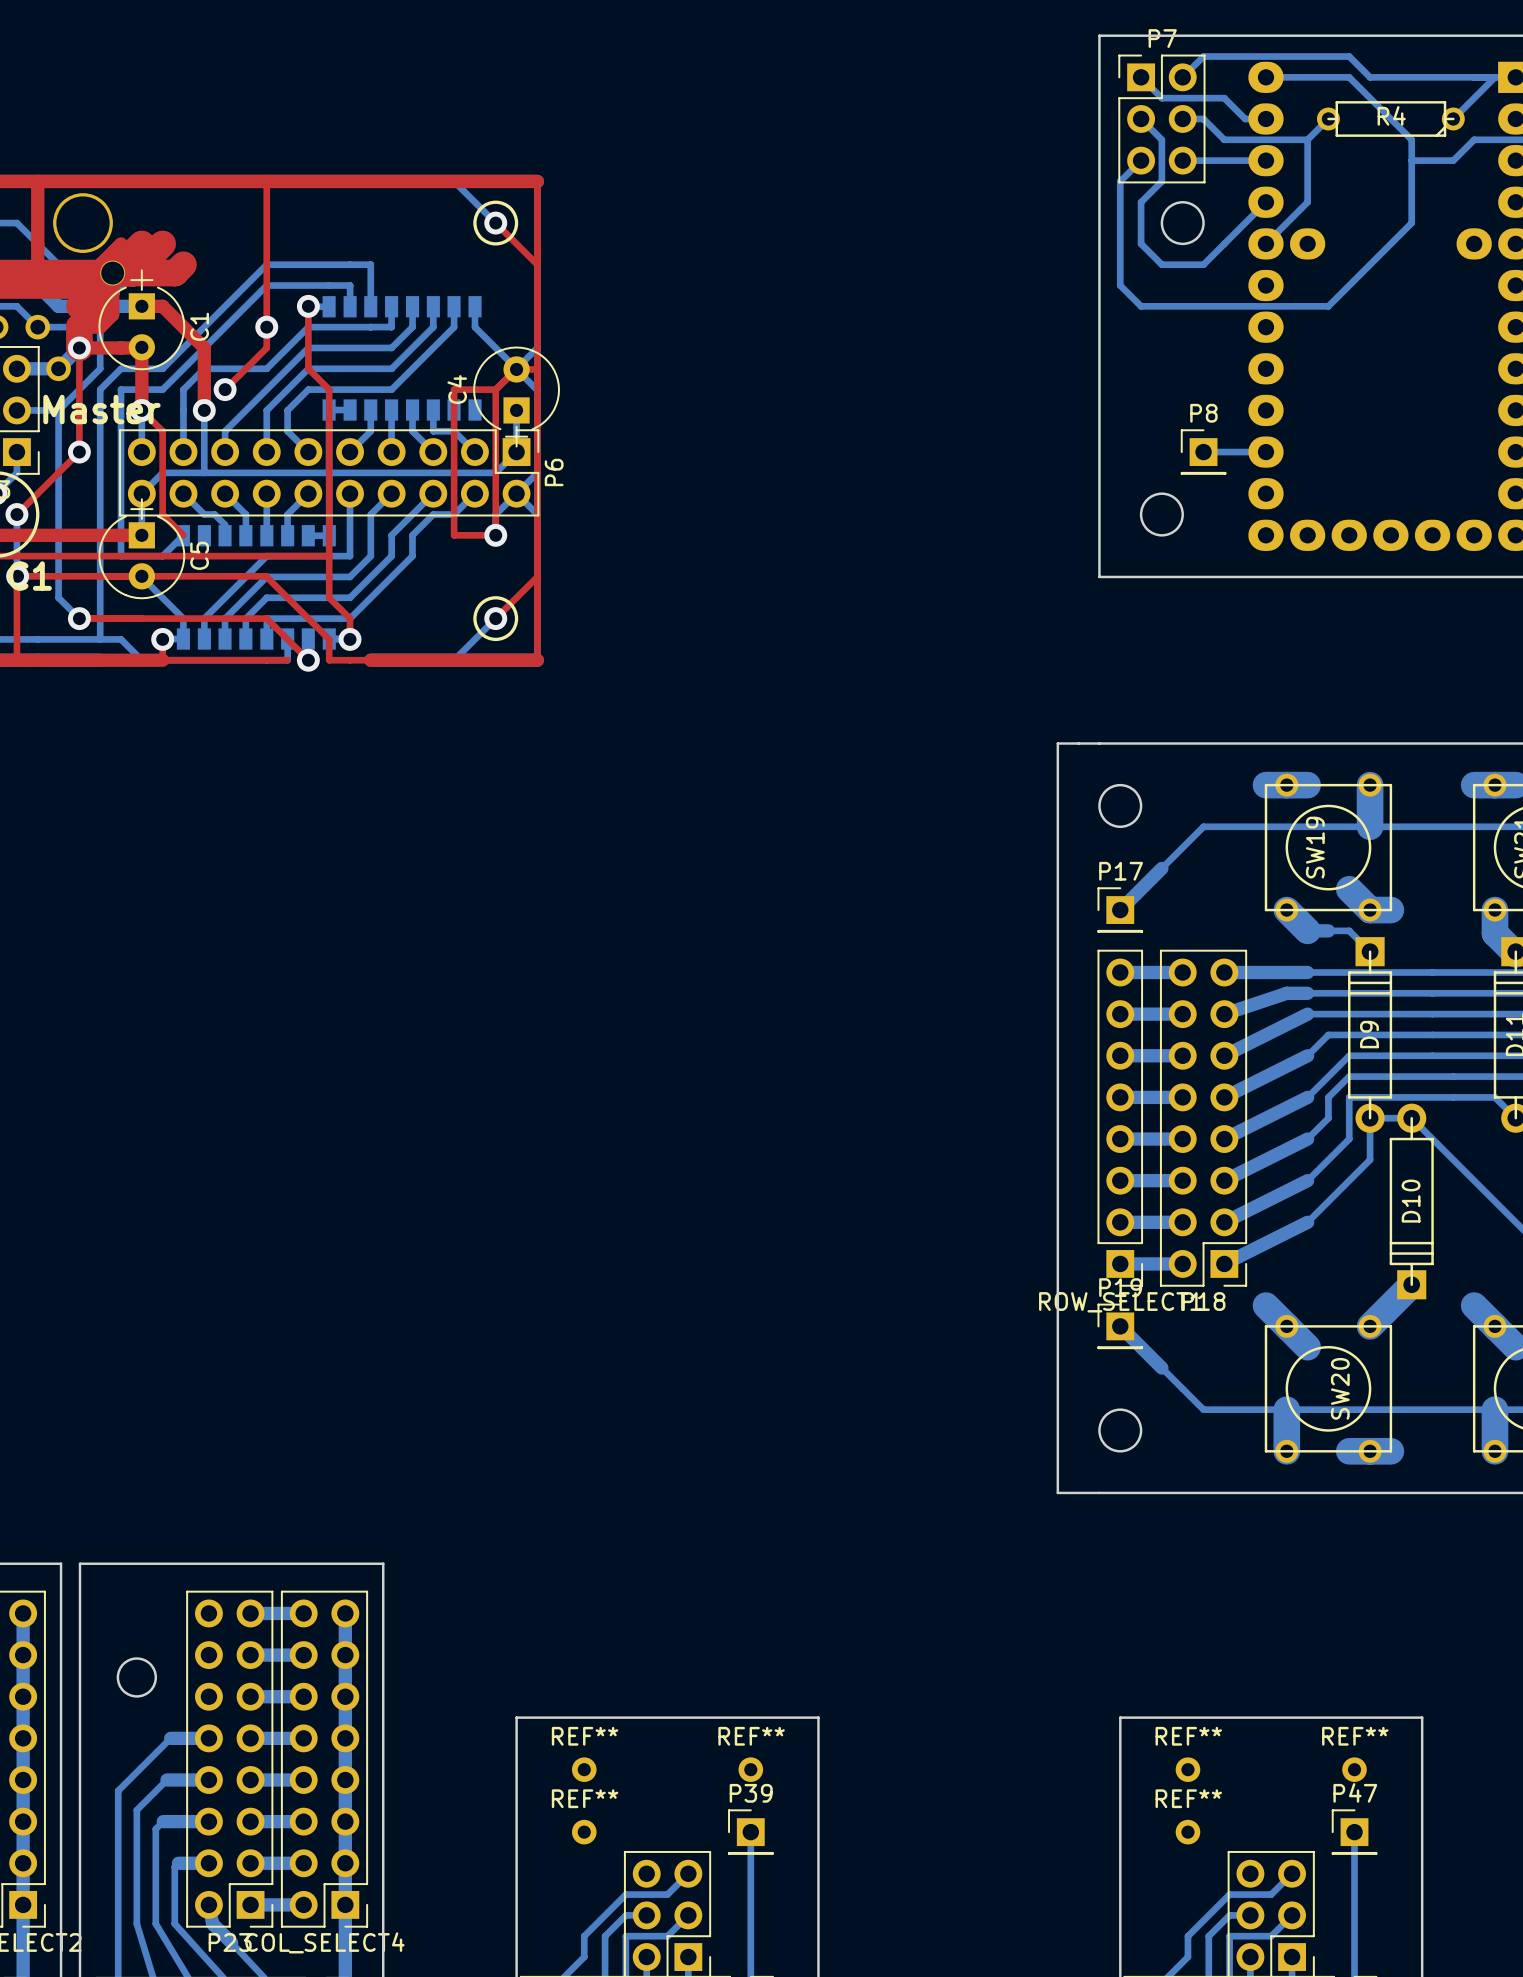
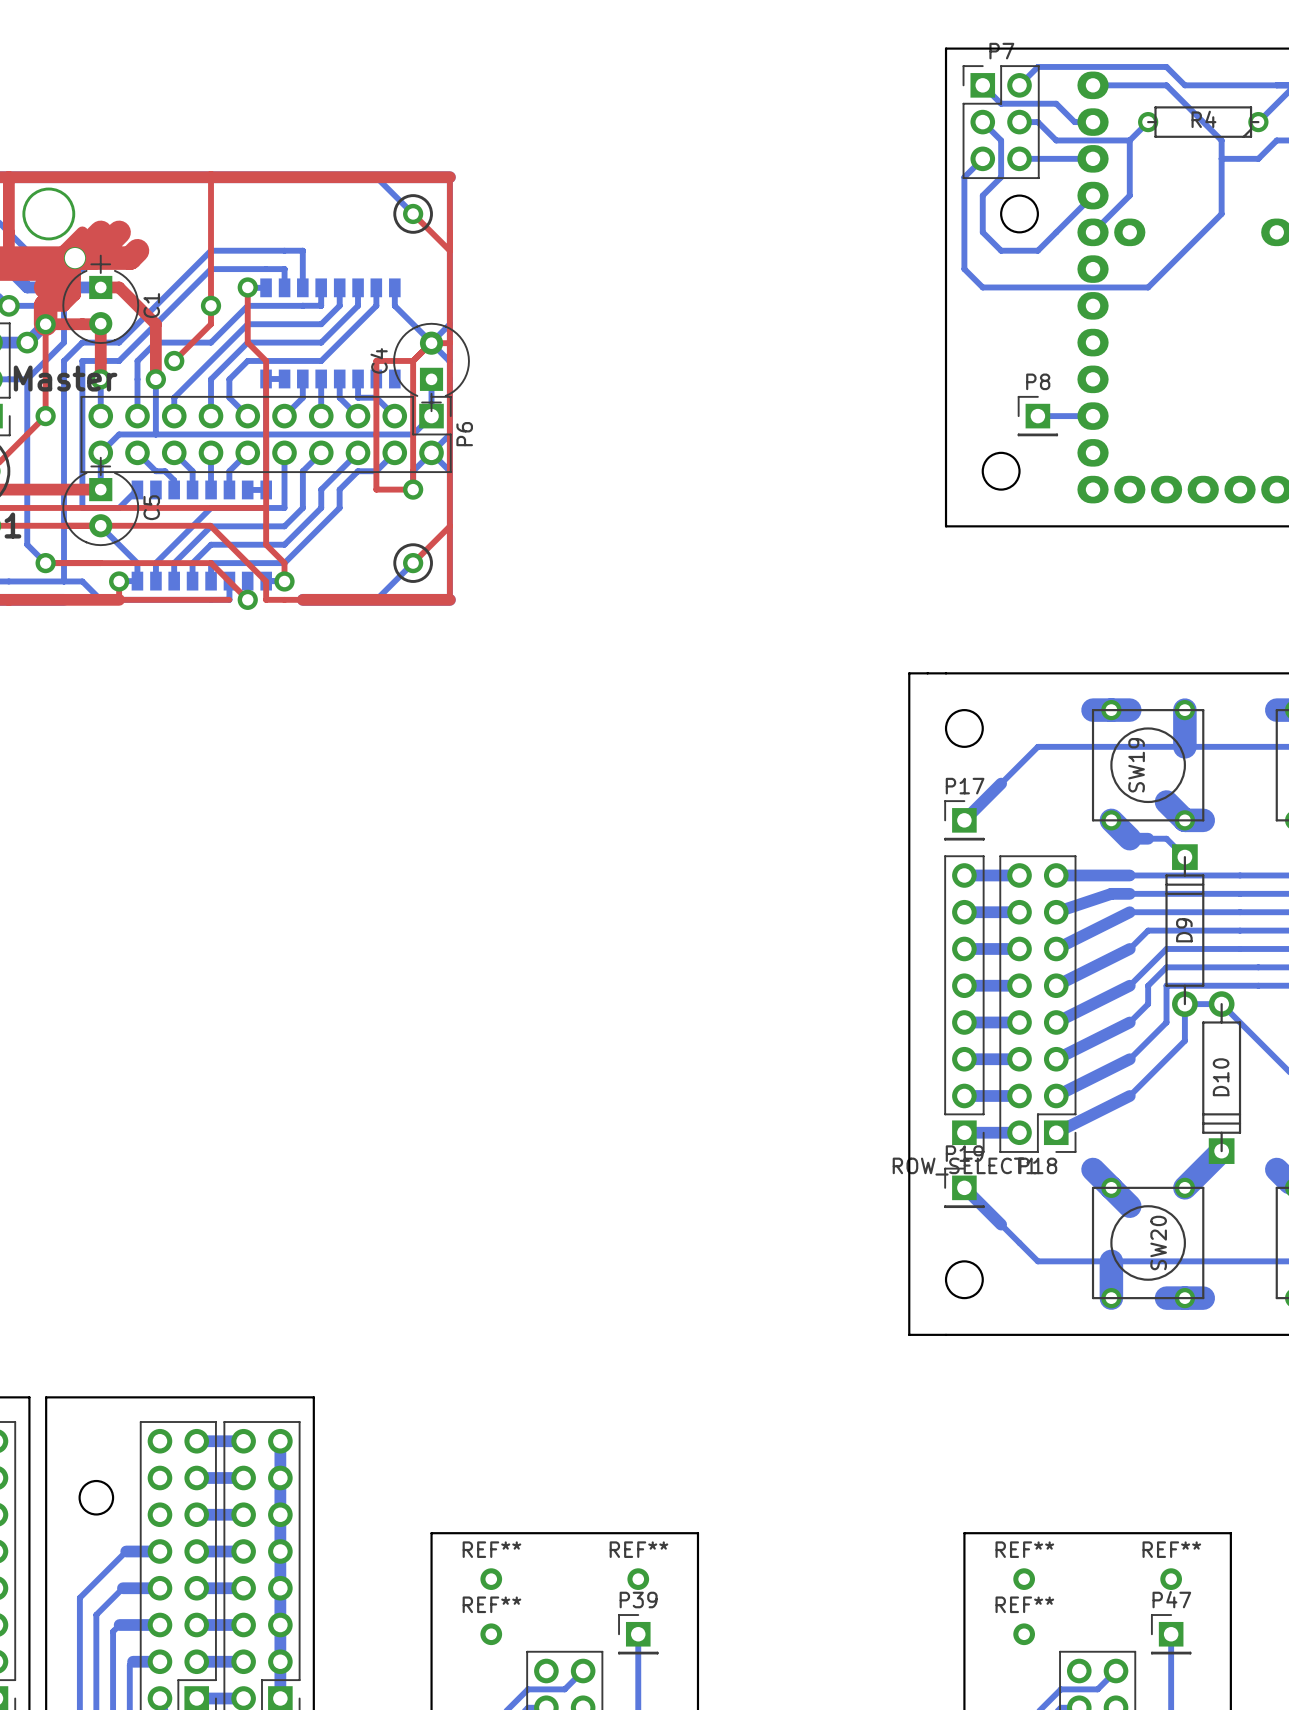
top track: (141, 410) (162, 431) (162, 514) (183, 535) -> none

